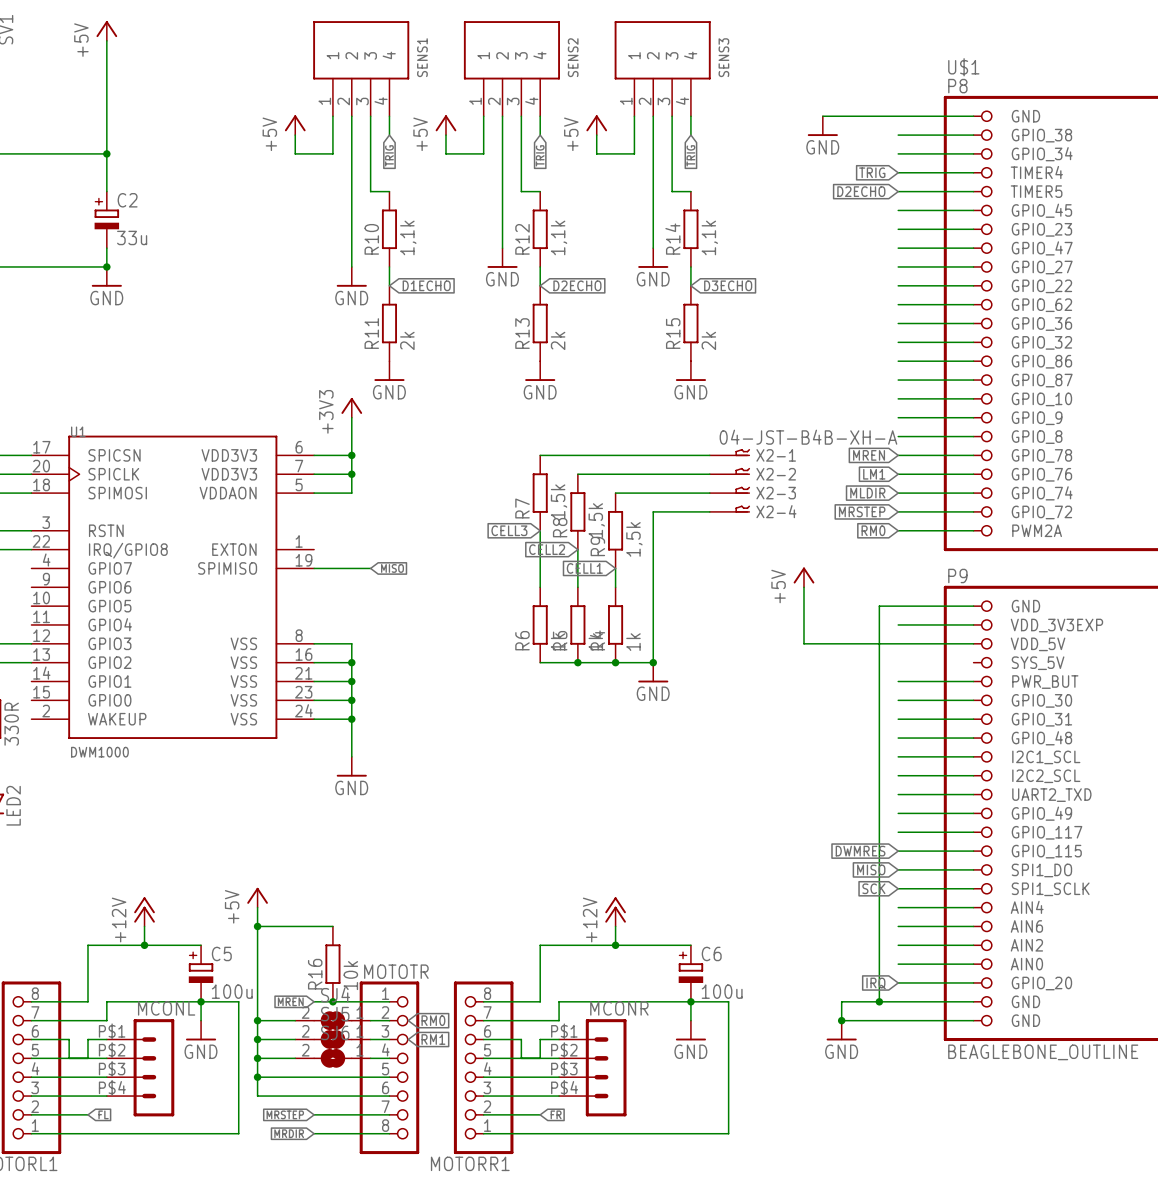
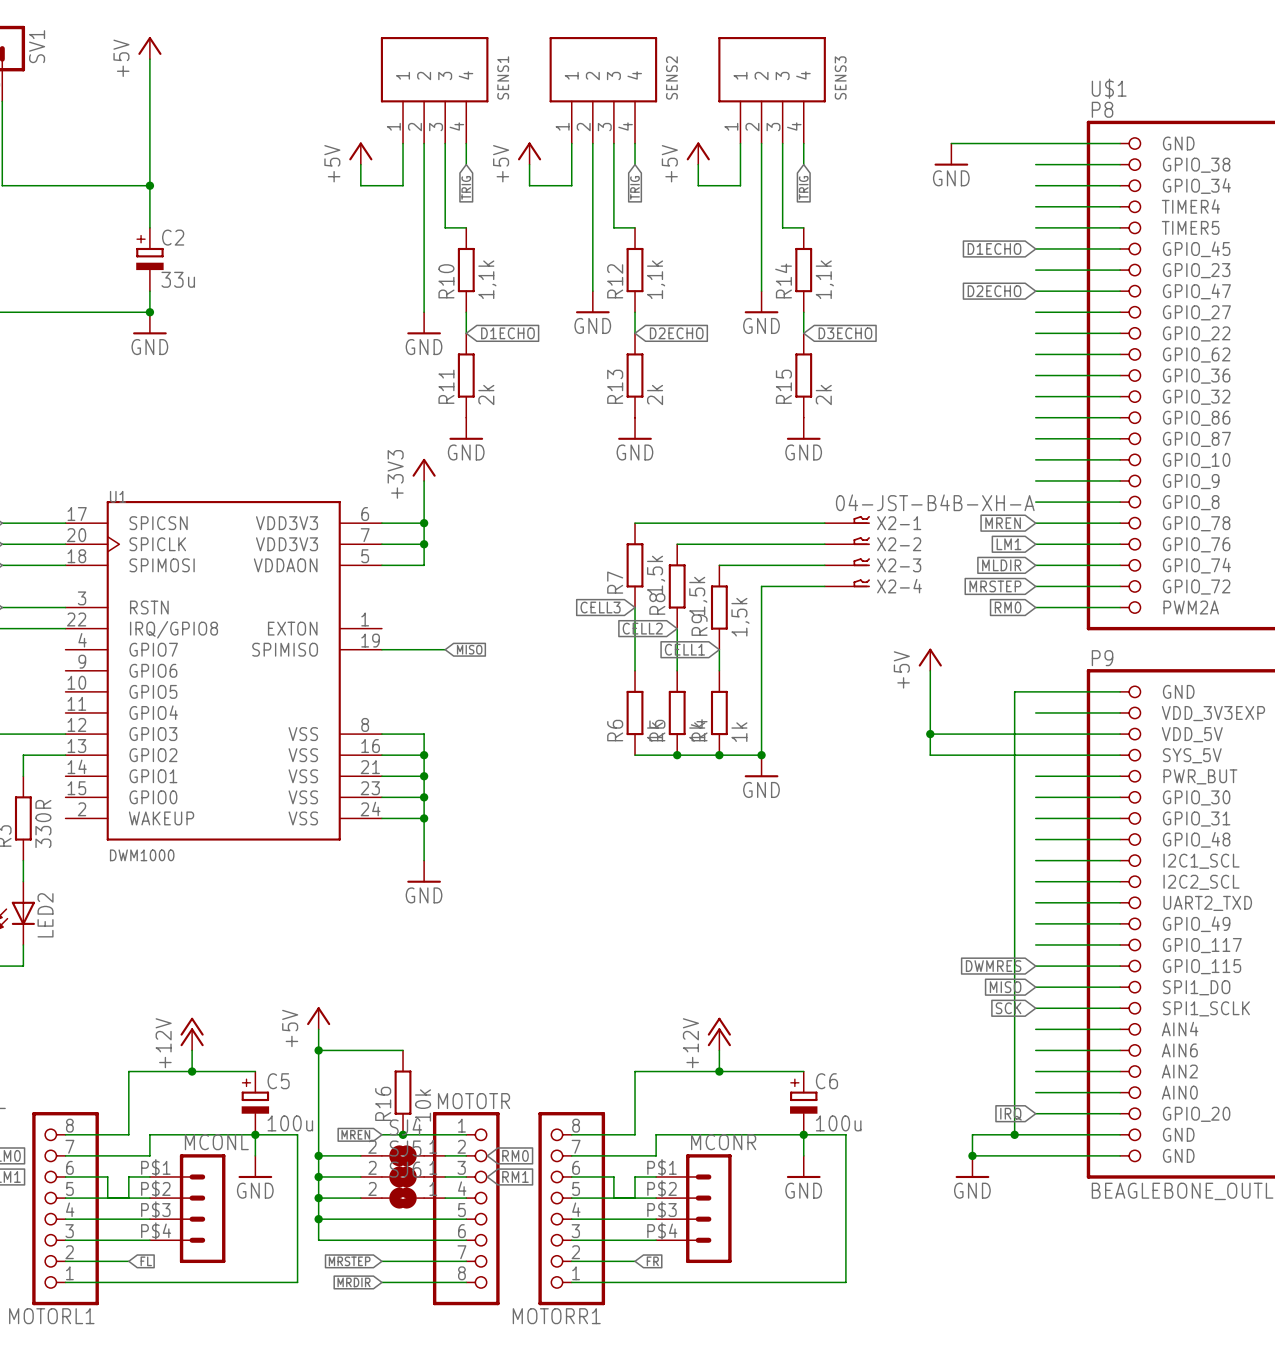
global label: TRIG (872, 172) -> none
global label position: D2ECHO (861, 191) -> D2ECHO (994, 291)
global label: none -> D1ECHO (994, 248)
wire: none -> (930, 734) (930, 755) (1120, 755)
junction: none -> (930, 734)

